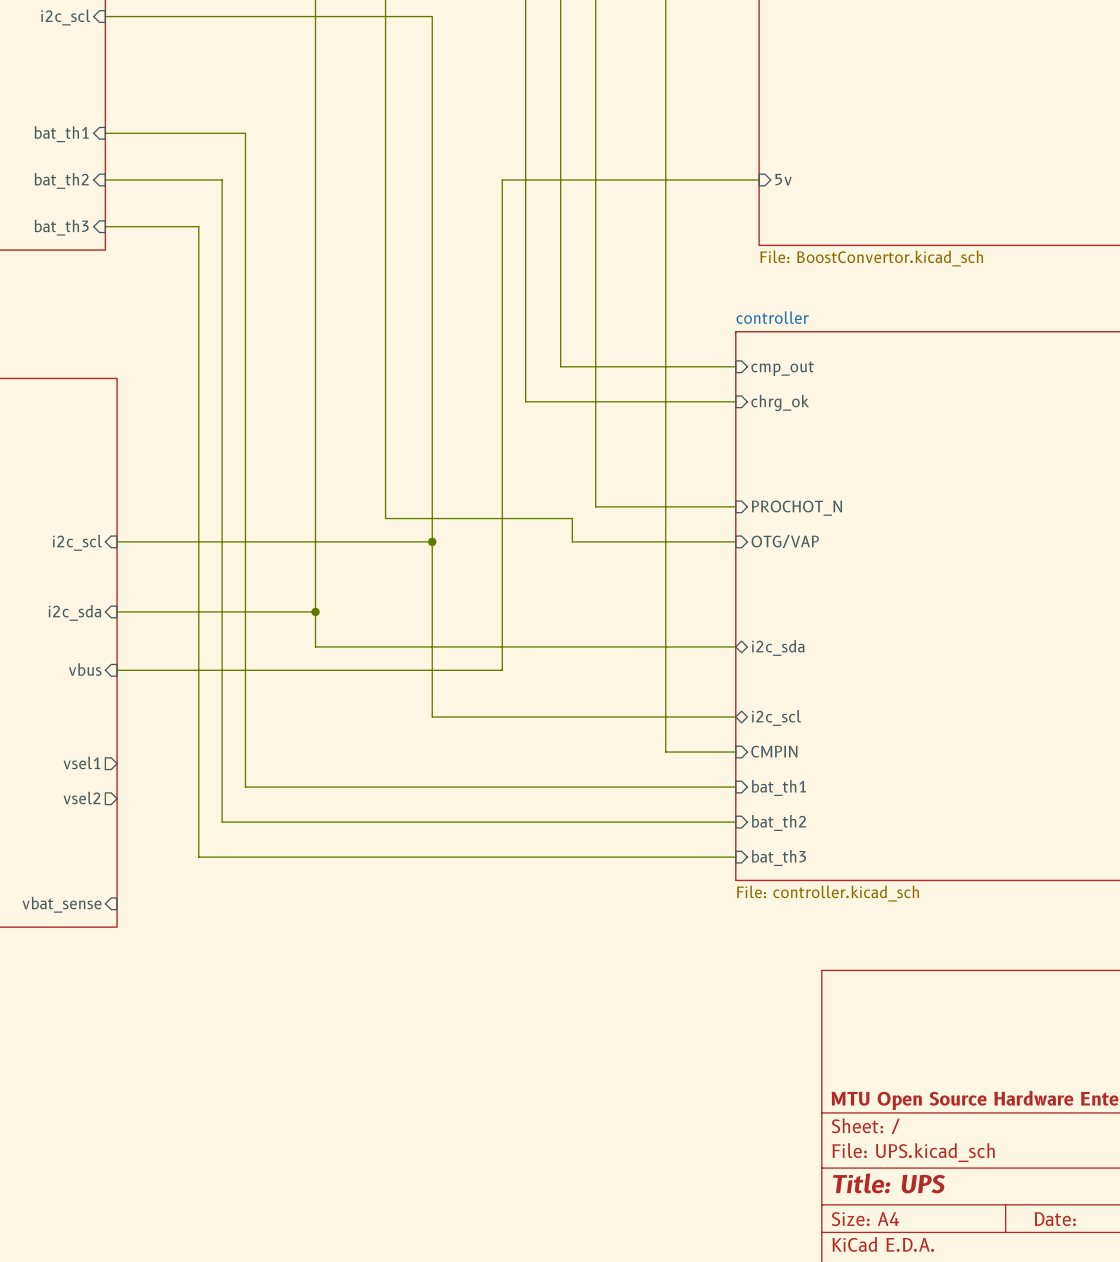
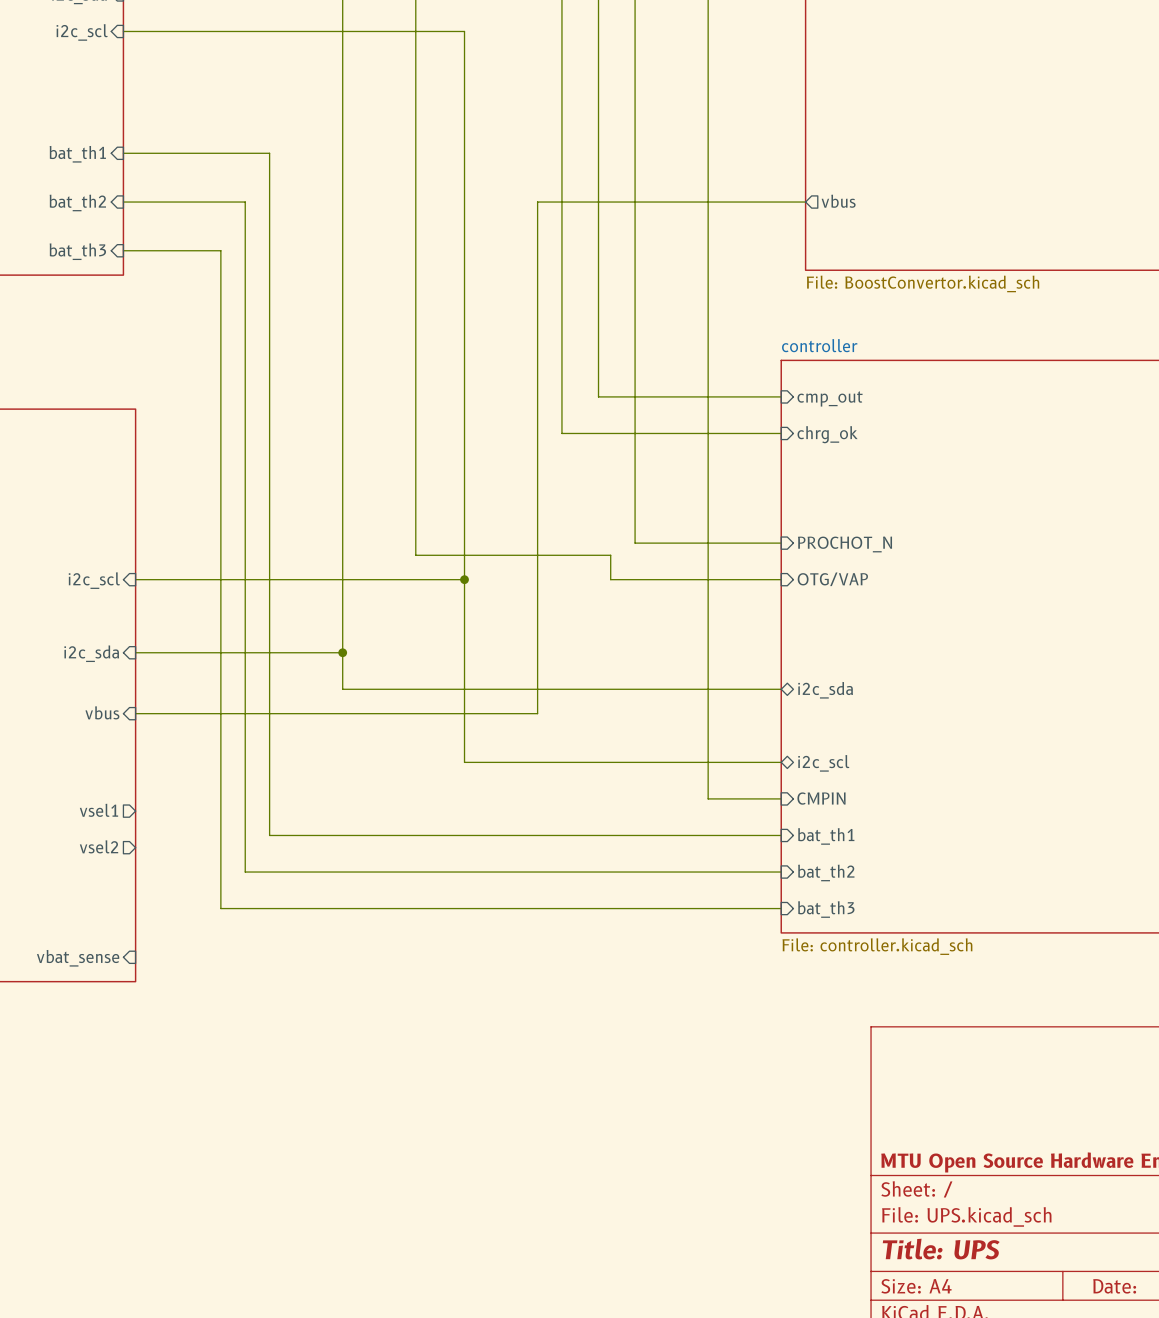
sheet pin shape: input (783, 179) -> output (838, 201)
sheet pin: 5v (783, 179) -> vbus (838, 201)

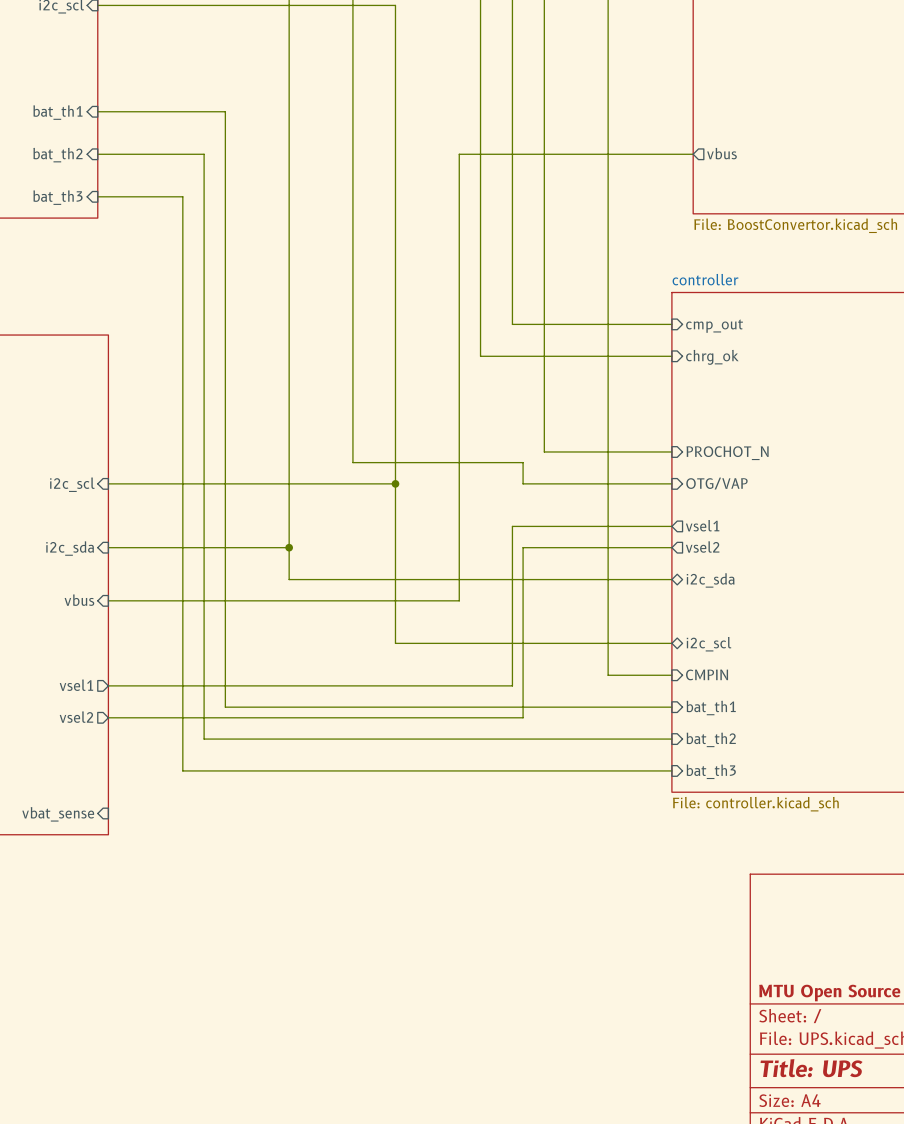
sheet pin: none -> vsel1 (702, 525)
wire: none -> (671, 526) (512, 526) (512, 685) (108, 685)
sheet pin: none -> vsel2 (702, 547)
wire: none -> (671, 547) (523, 547) (523, 717) (108, 717)

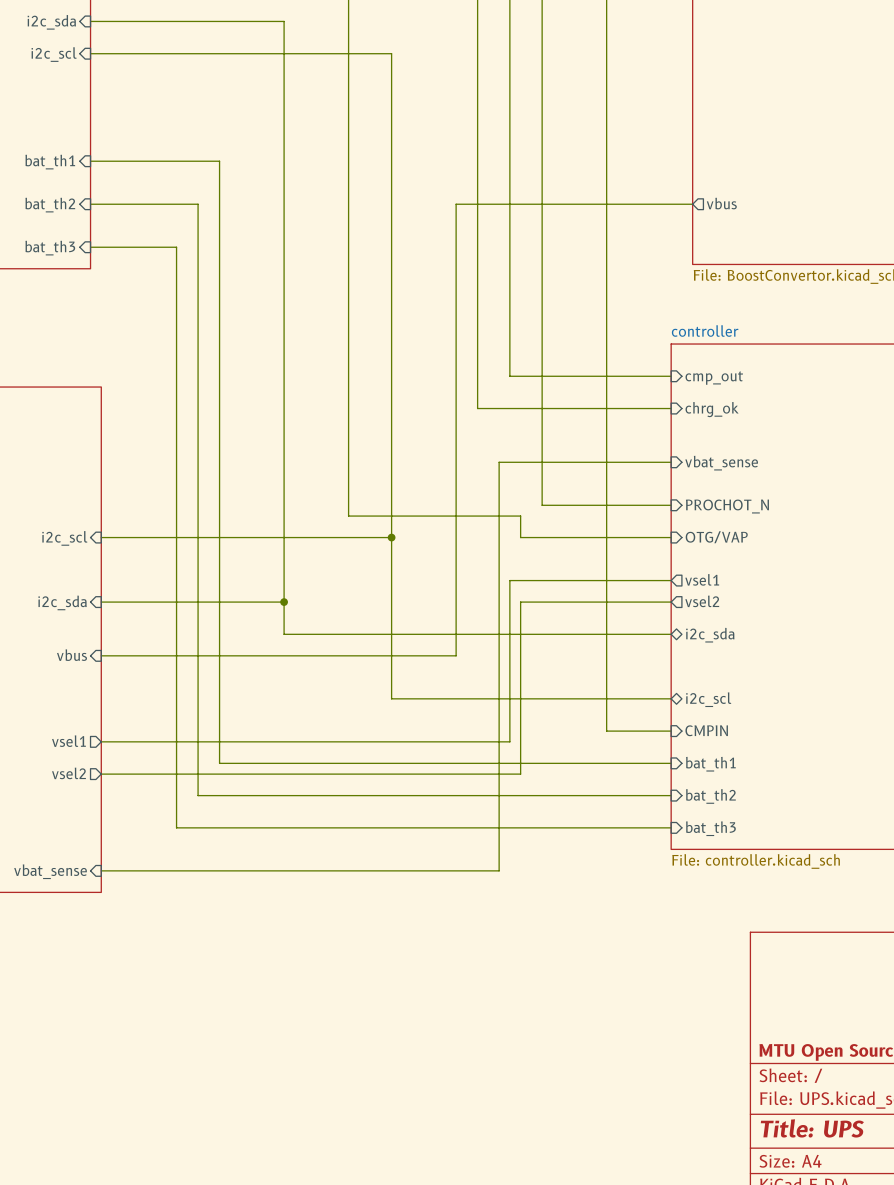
wire: none -> (671, 462) (499, 462) (499, 870) (101, 870)
sheet pin: none -> vbat_sense (721, 463)

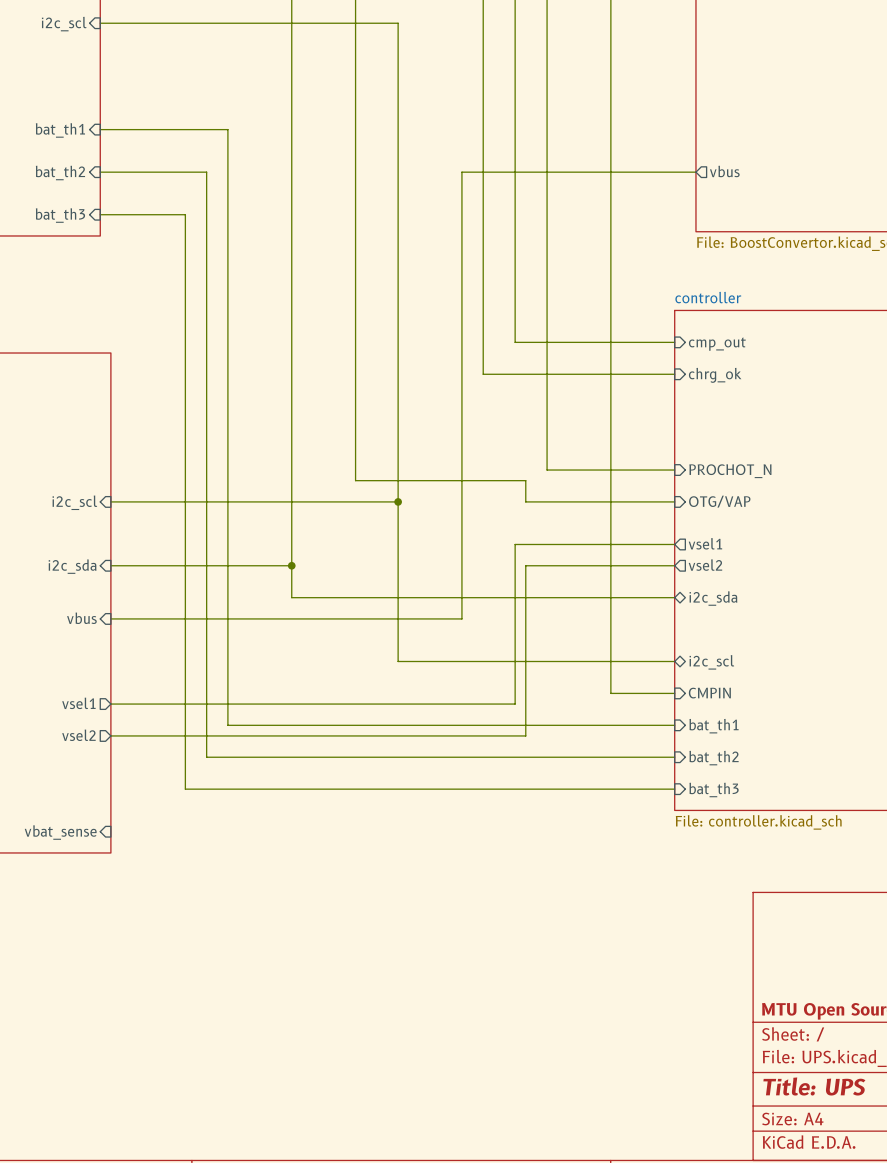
wire: (671, 462) (499, 462) (499, 870) (101, 870) -> none
sheet pin: vbat_sense (721, 463) -> none

